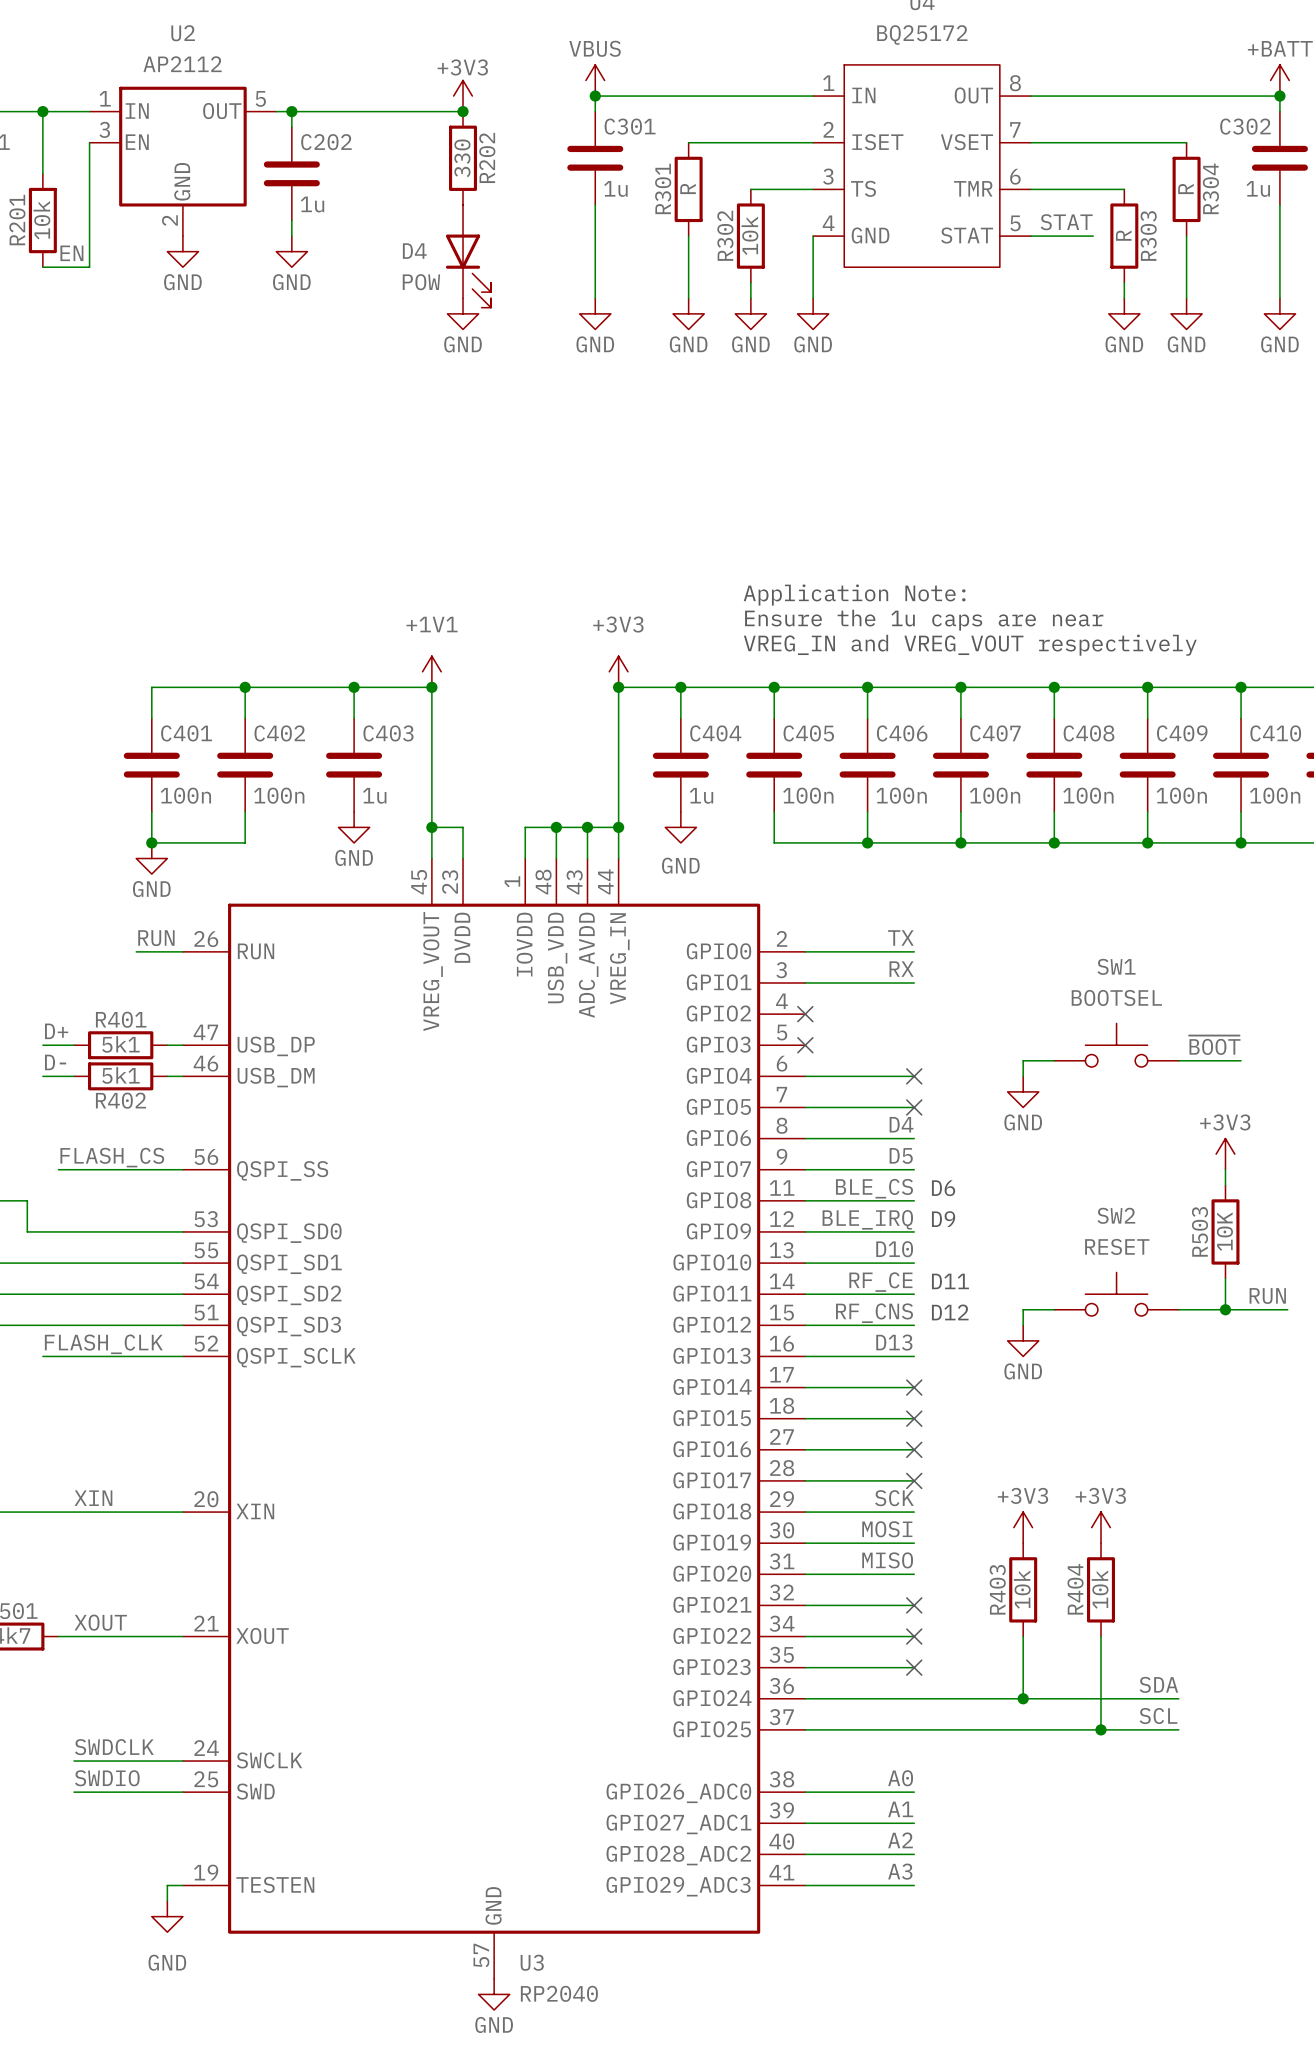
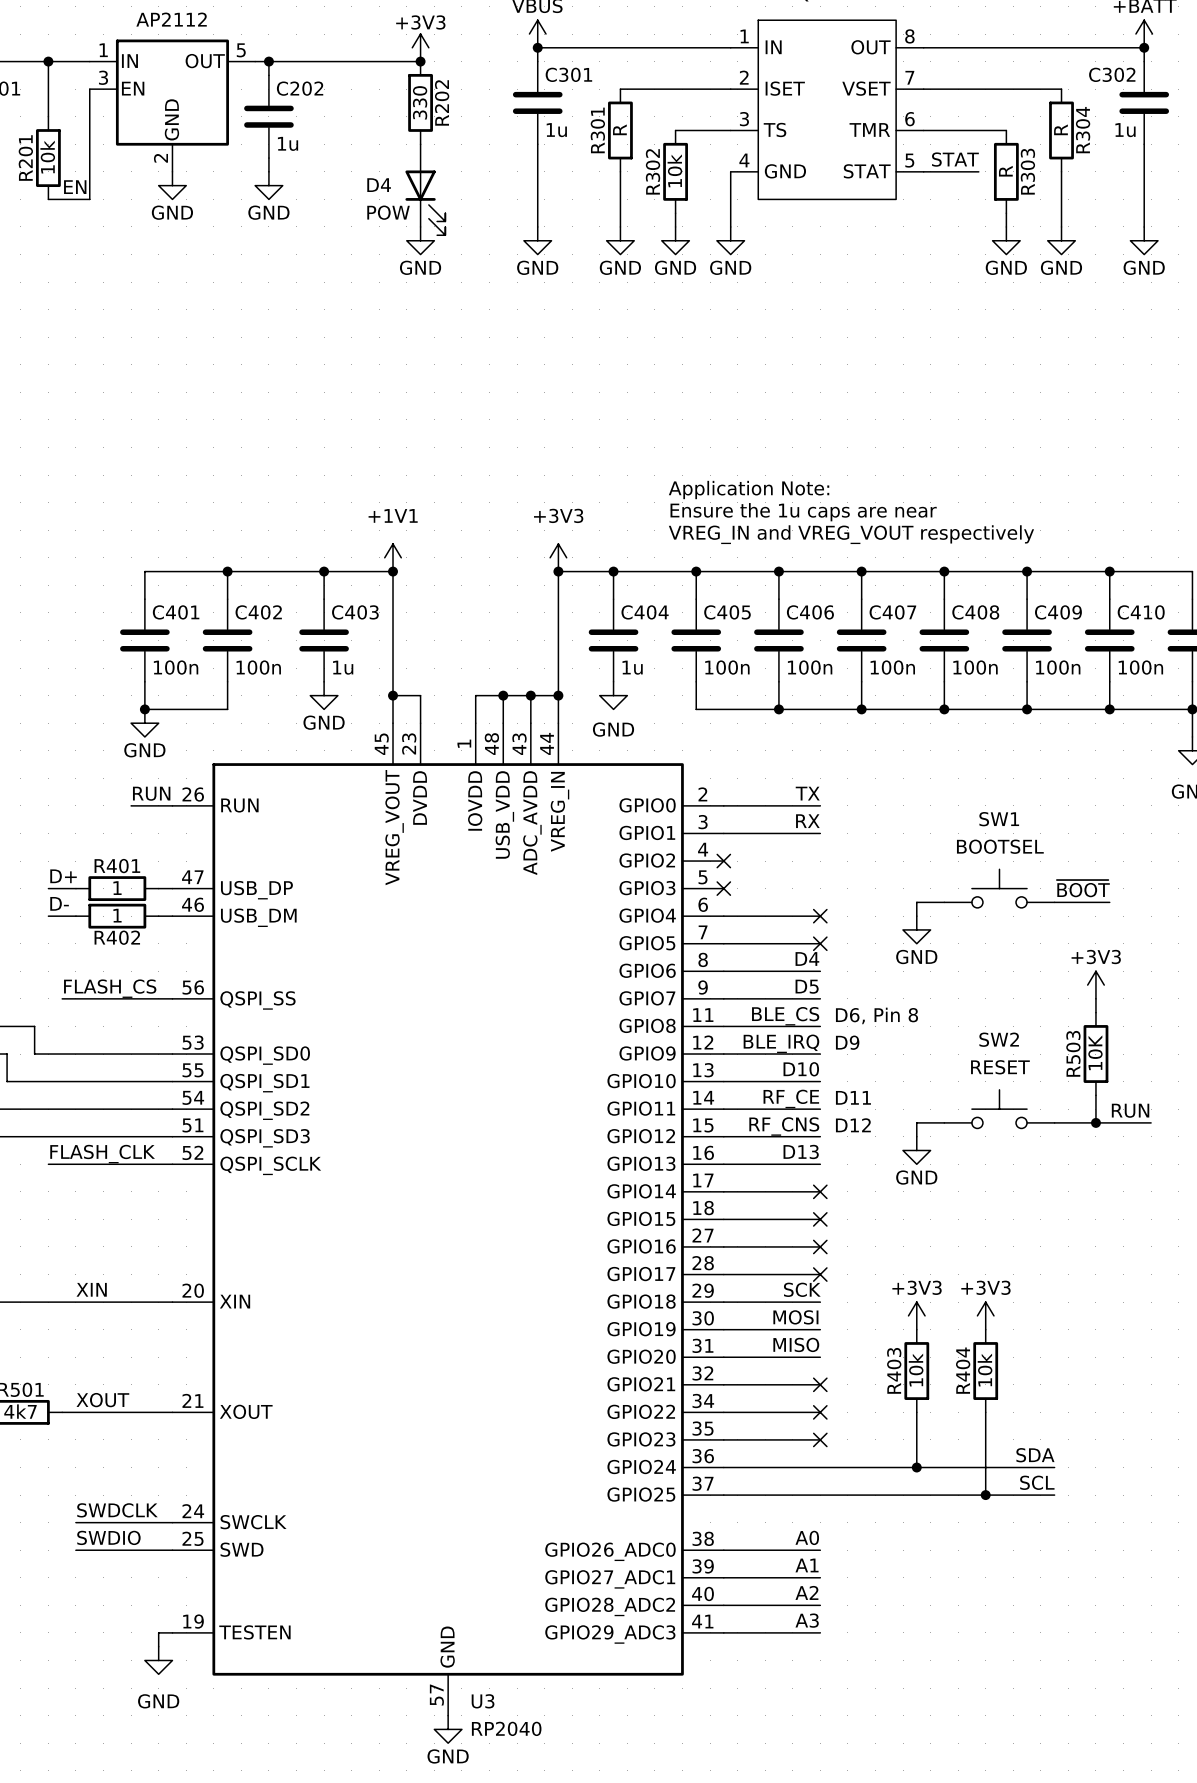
R401 value: 5k1 (120, 1044) -> 1 (117, 888)
R402 value: 5k1 (120, 1075) -> 1 (117, 915)
text: D6 (943, 1188) -> D6, Pin 8 (877, 1015)

